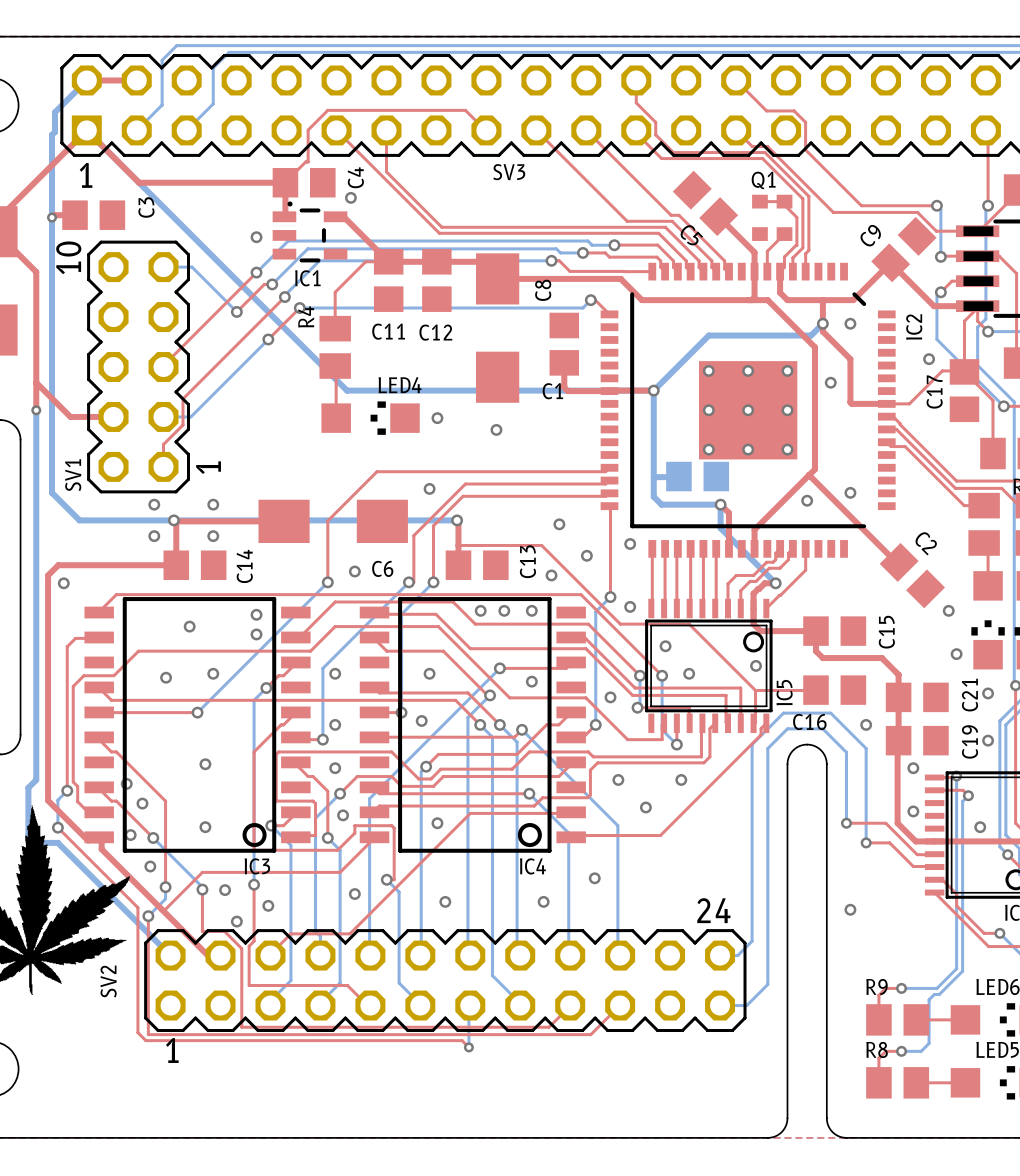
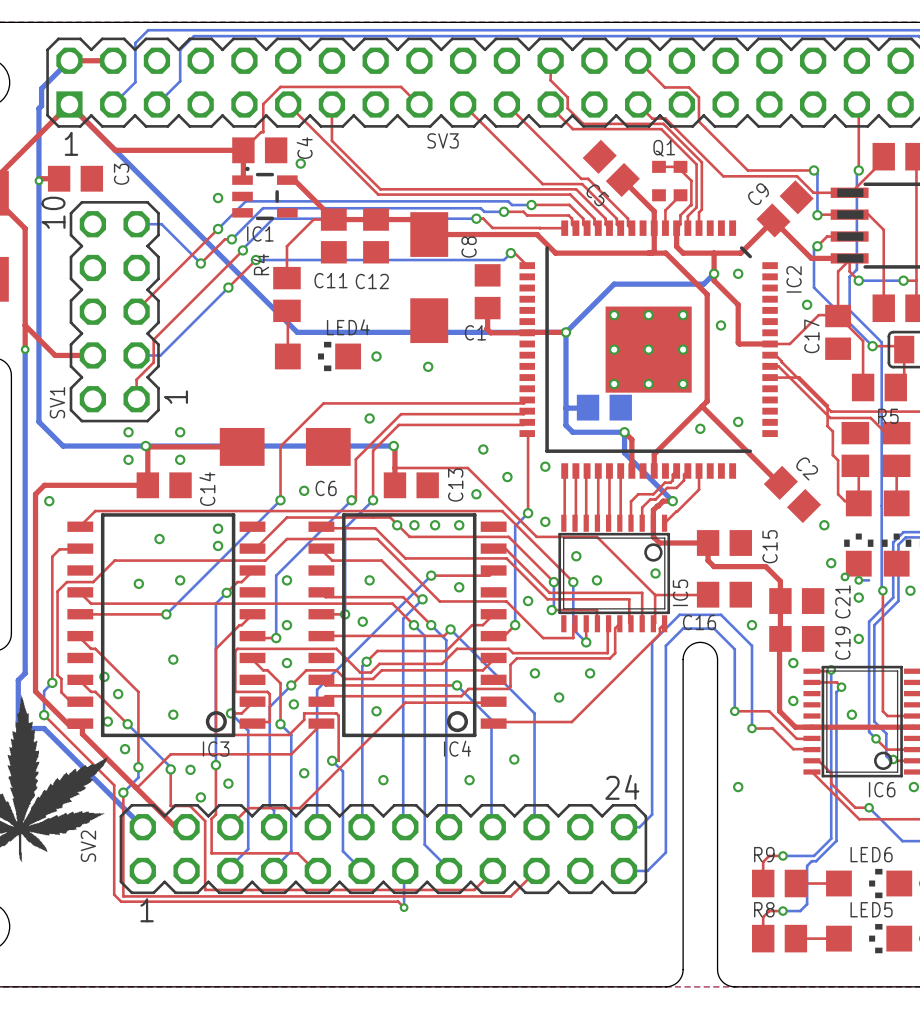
top track: (886, 442) (891, 446) (905, 446) (964, 505) (984, 505) -> (770, 377) (799, 377) (827, 405) (827, 426) (832, 431) (832, 455) (838, 460) (838, 494) (845, 501) (863, 501)
via: none -> (397, 525)
via: none -> (845, 576)
bottom track: none -> (858, 580) (869, 580)
via: none -> (858, 580)

